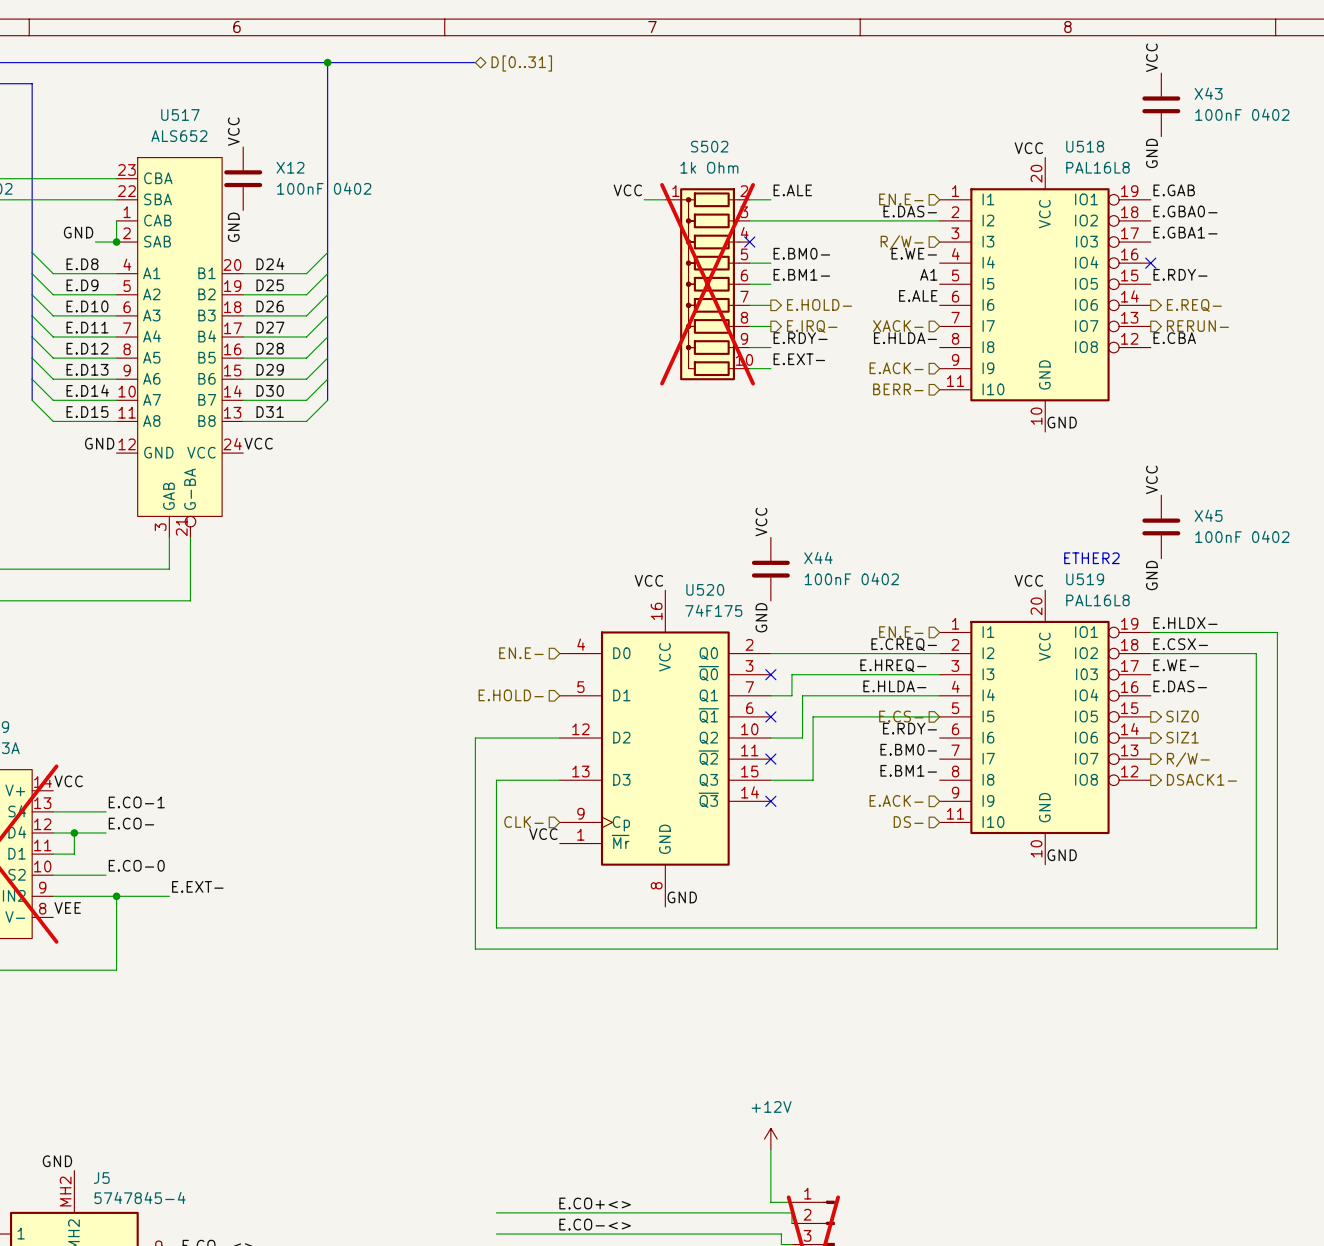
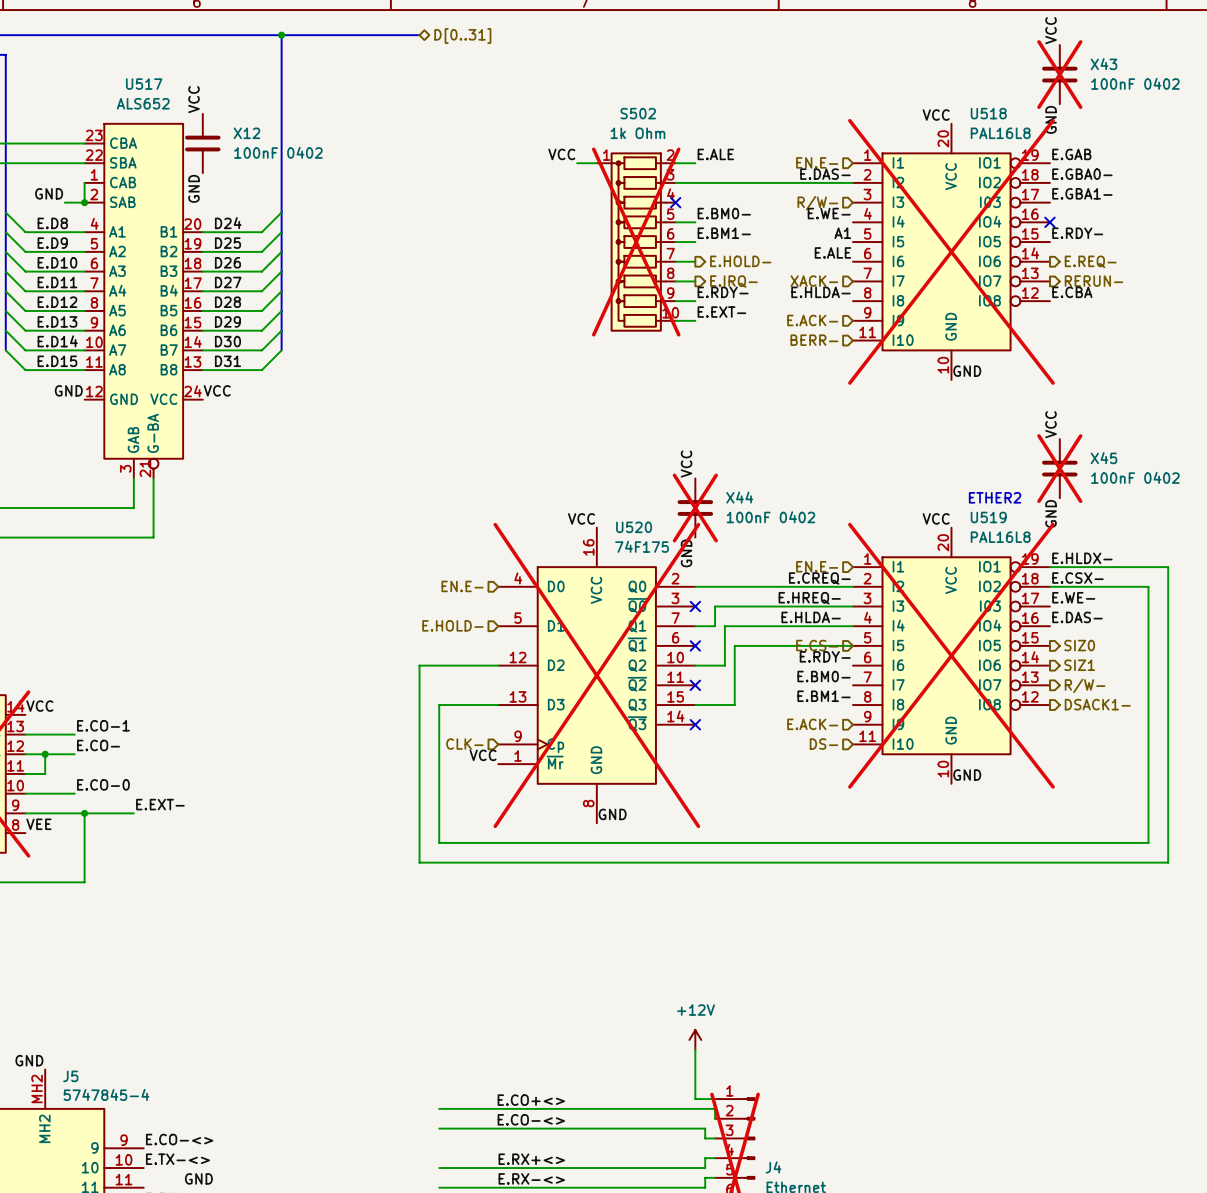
X43 do-not-place cross: none -> (1059, 74)
U518 do-not-place cross: none -> (951, 251)
X45 do-not-place cross: none -> (1059, 468)
X44 do-not-place cross: none -> (695, 508)
U519 do-not-place cross: none -> (951, 655)
U520 do-not-place cross: none -> (596, 675)

